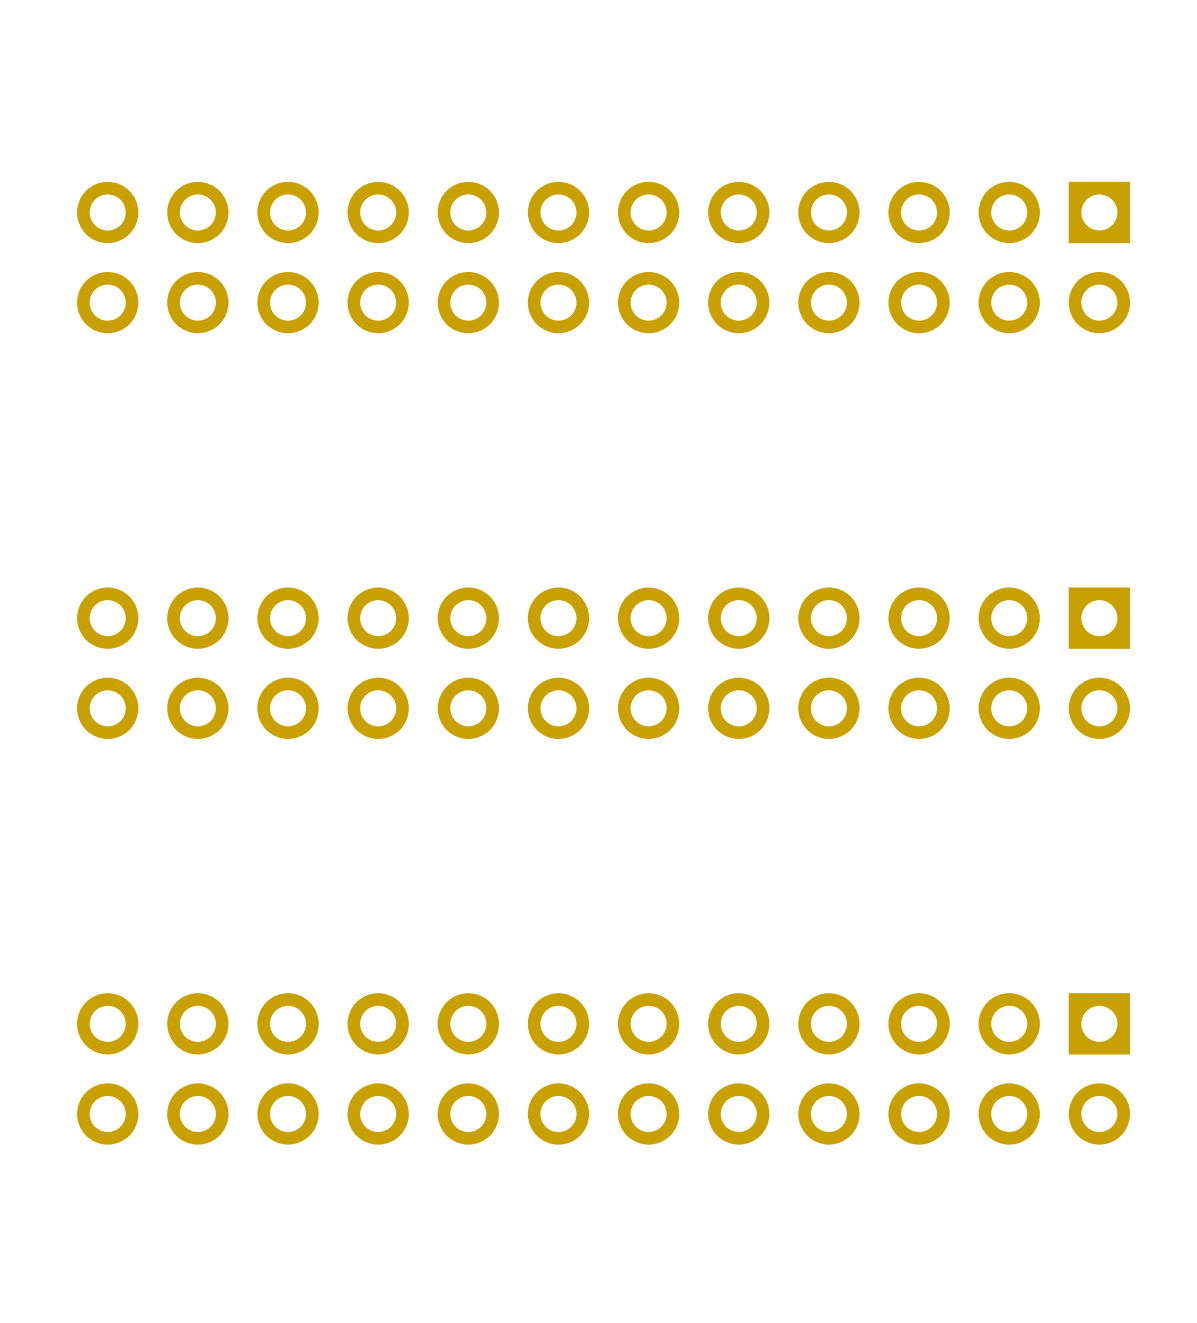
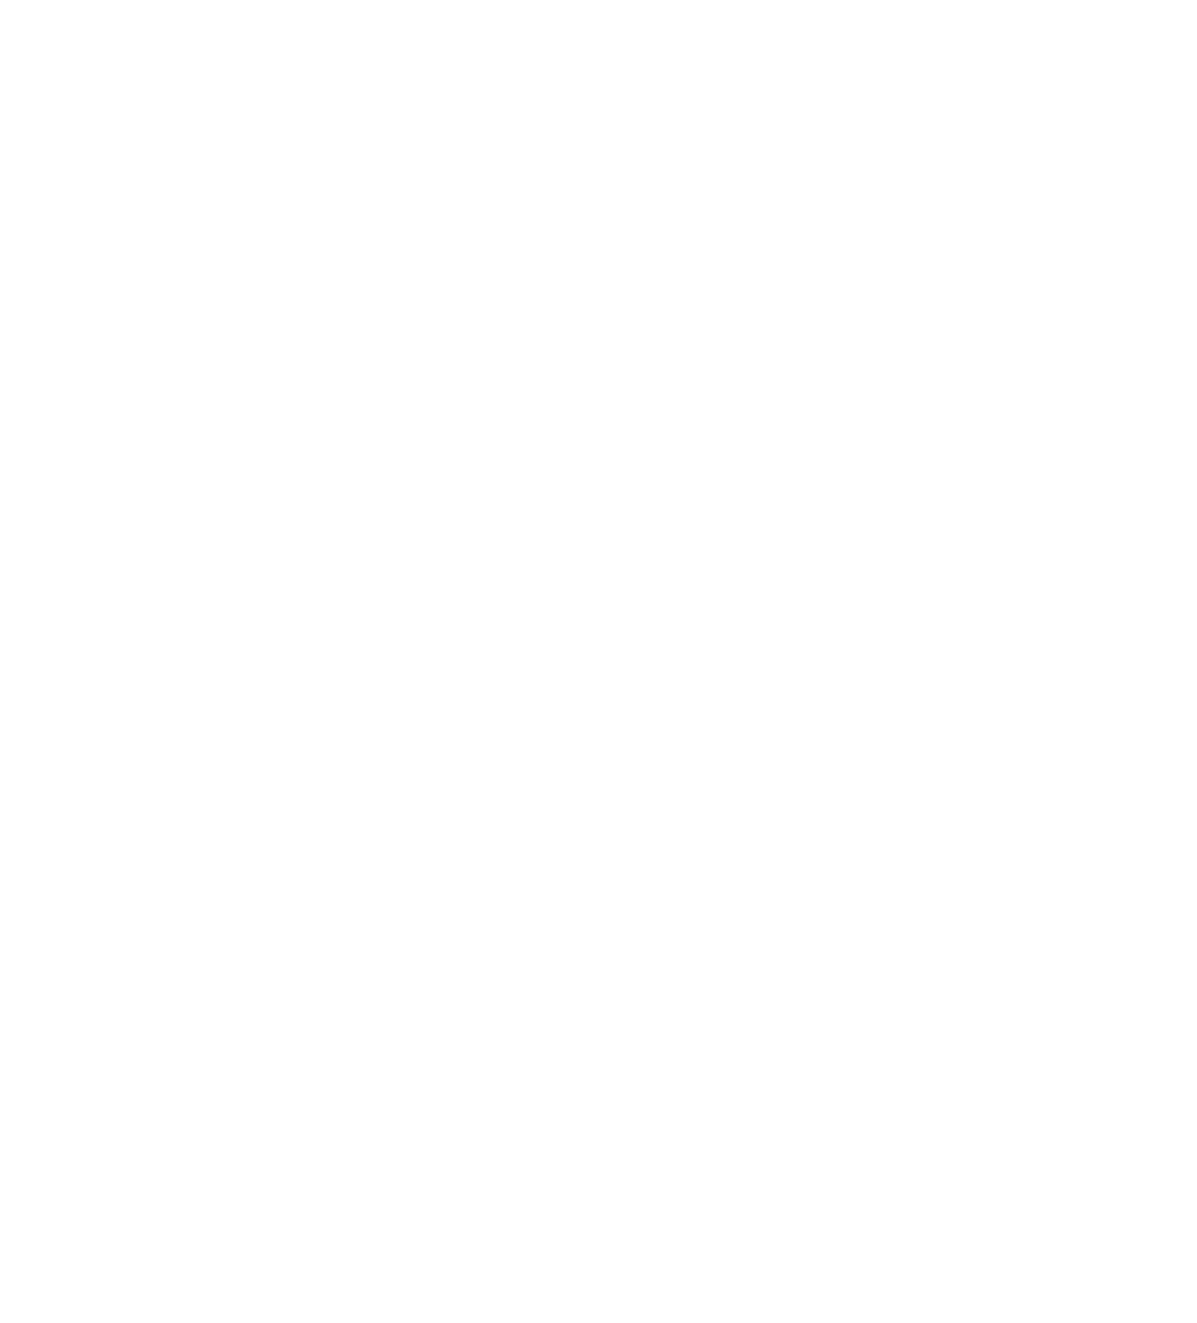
part: (603, 257) -> none
part: (603, 663) -> none
part: (603, 1068) -> none

